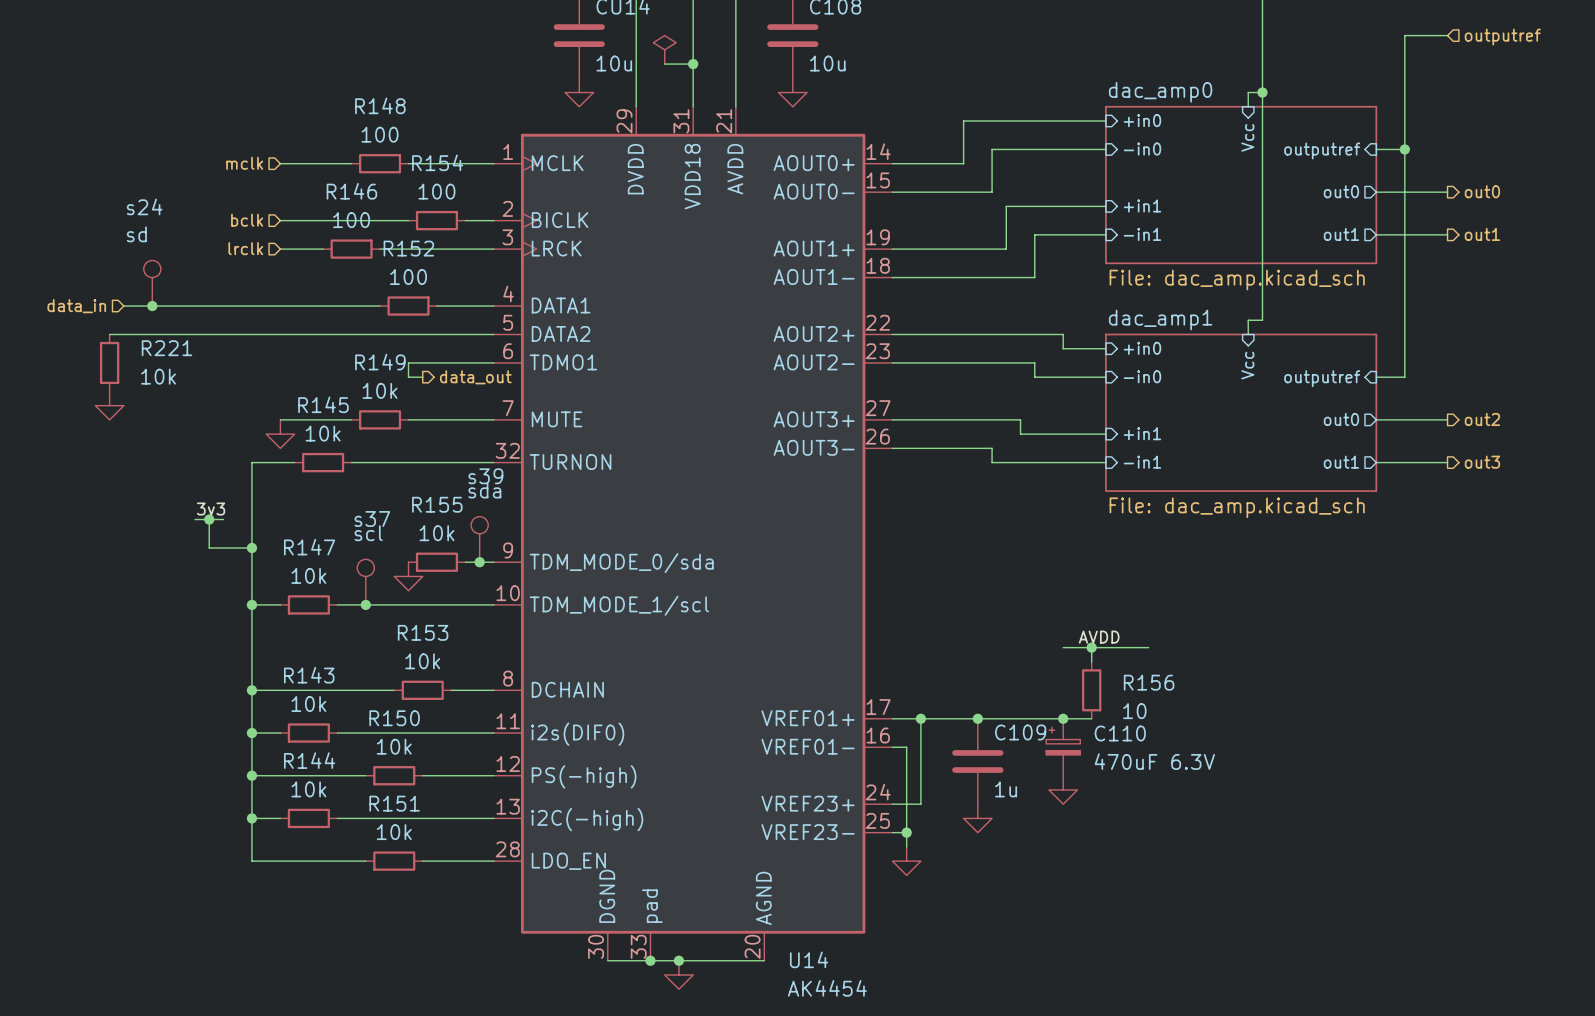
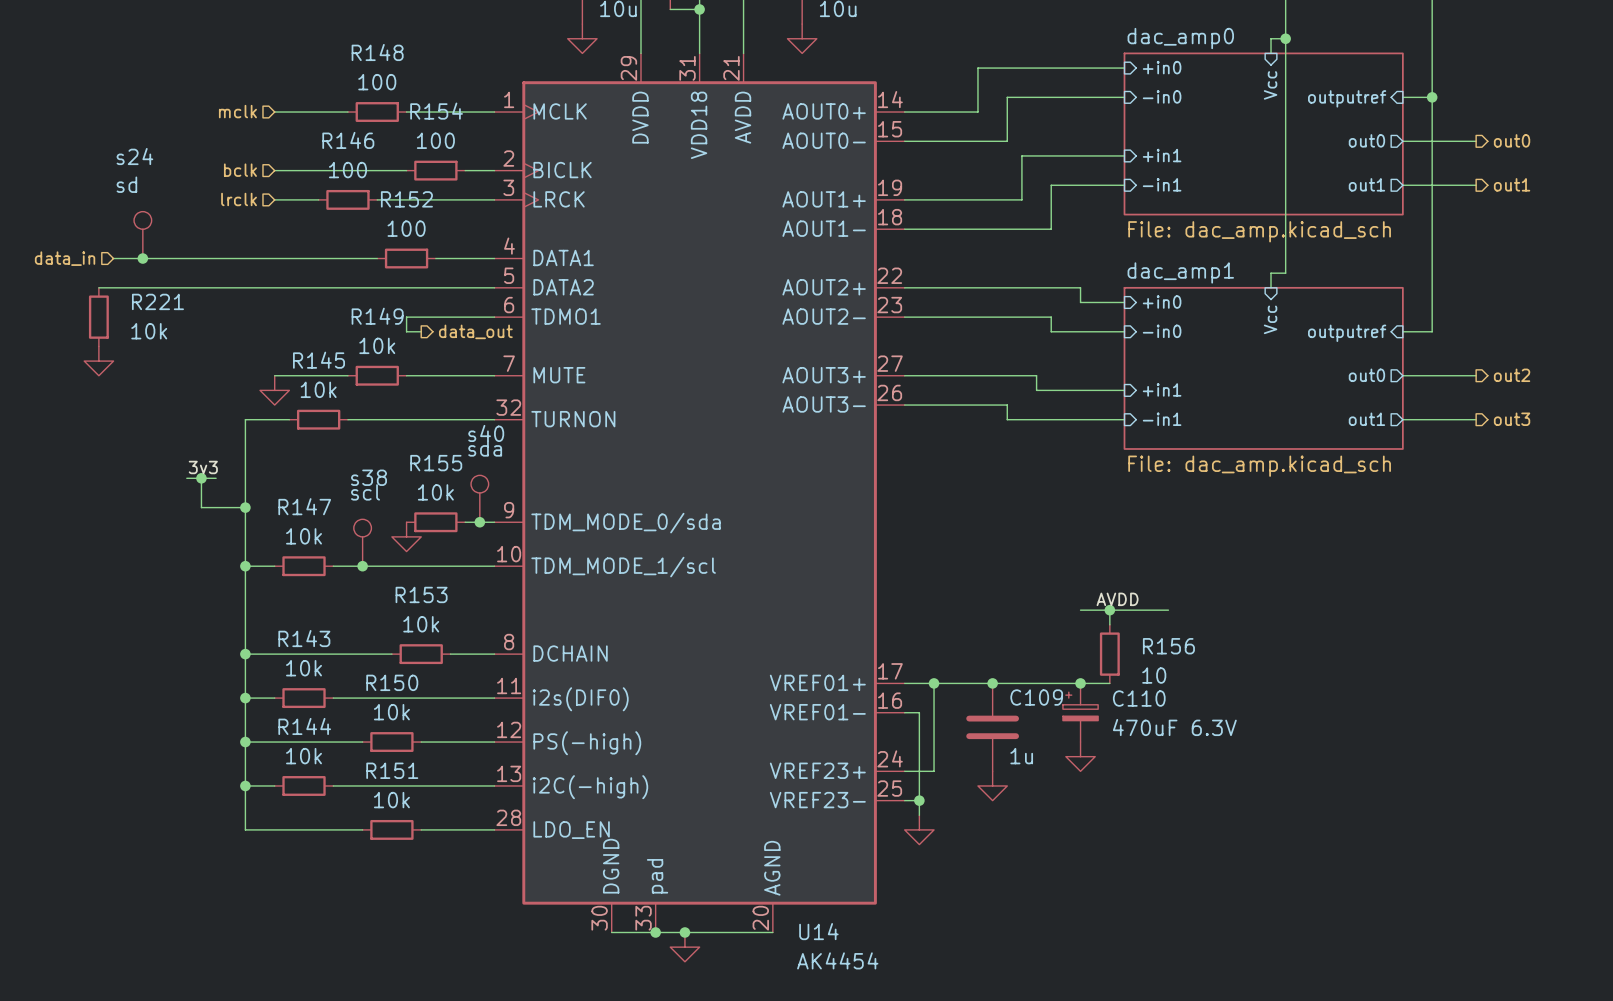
s39 name: s39 (485, 476) -> s40 (486, 433)
s37 name: s37 (372, 518) -> s38 (369, 477)

